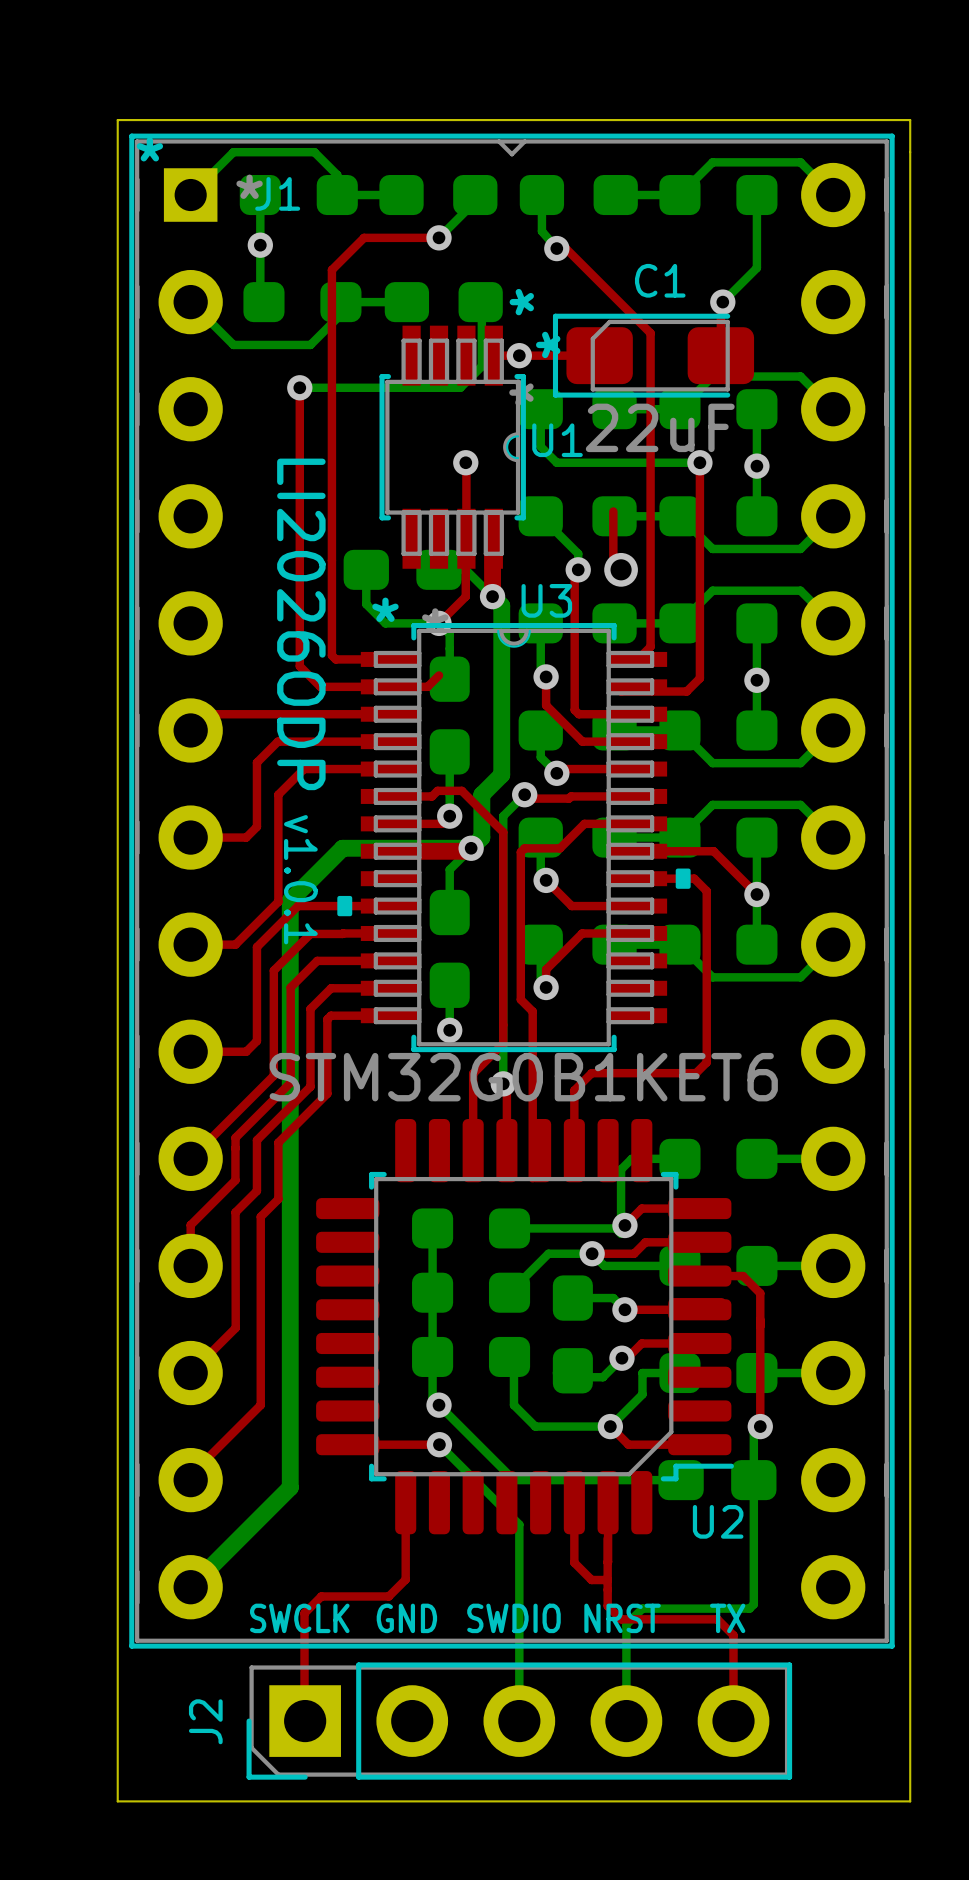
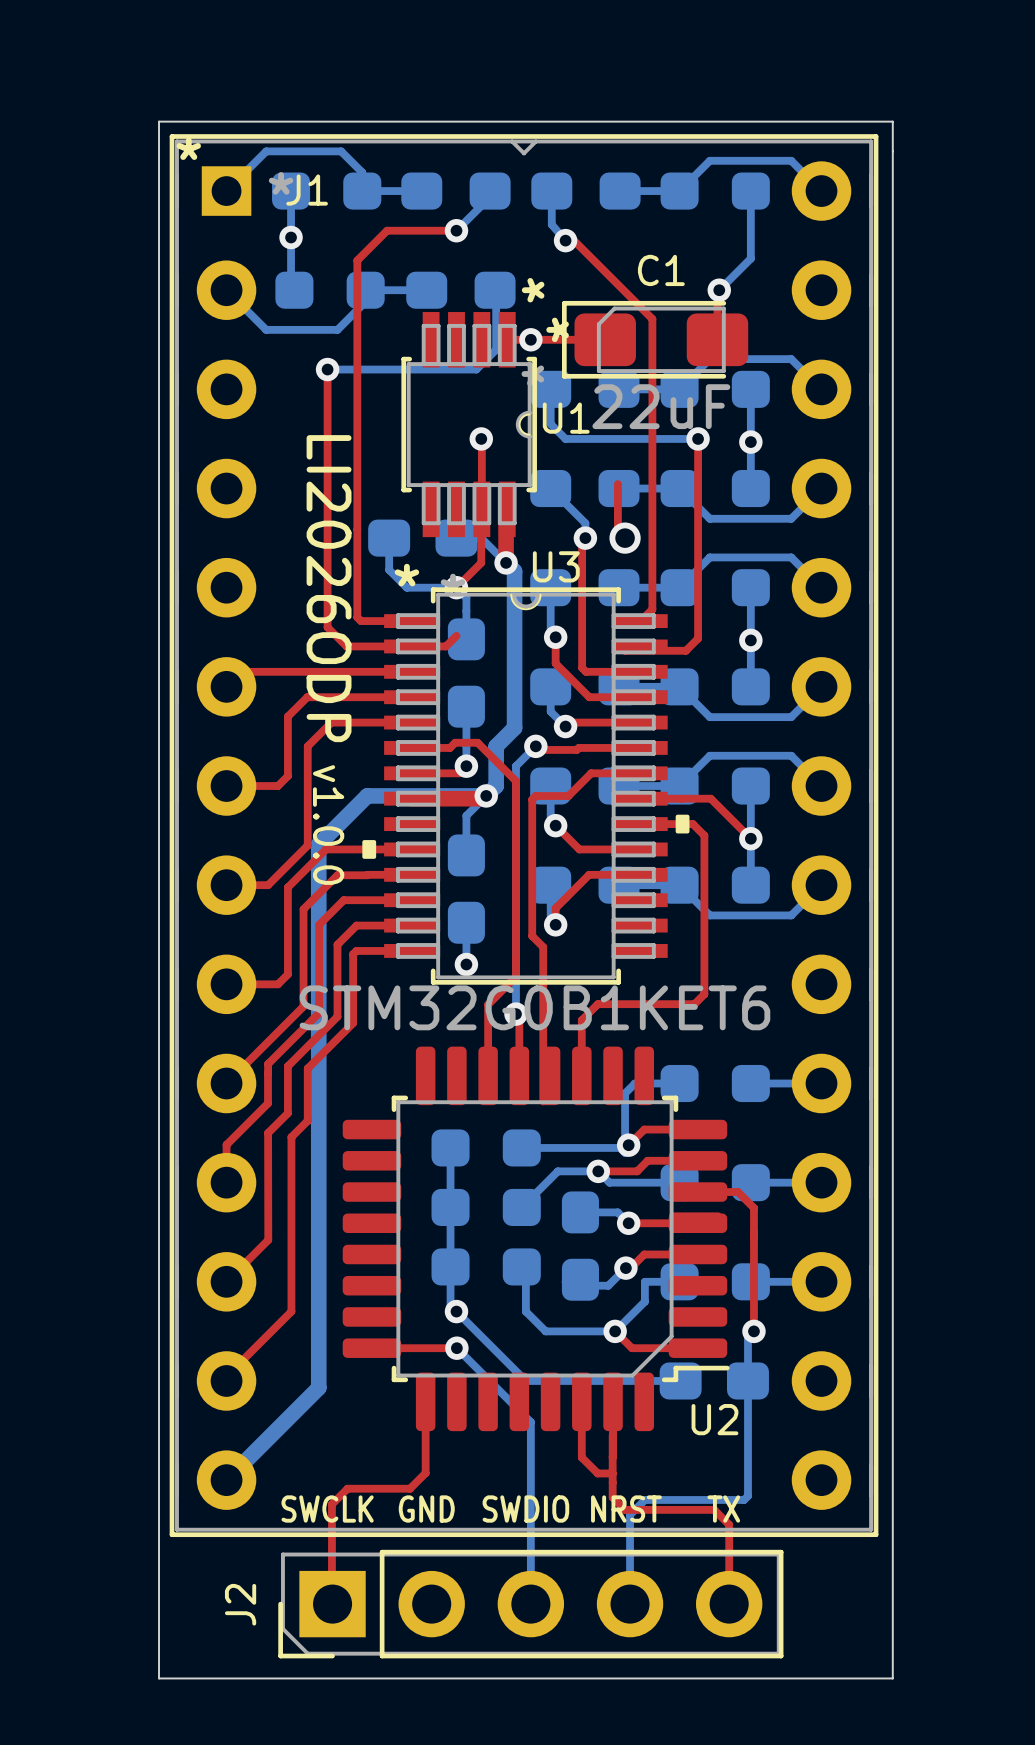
text: v1.0.1 (300, 879) -> v1.0.0 (328, 825)

